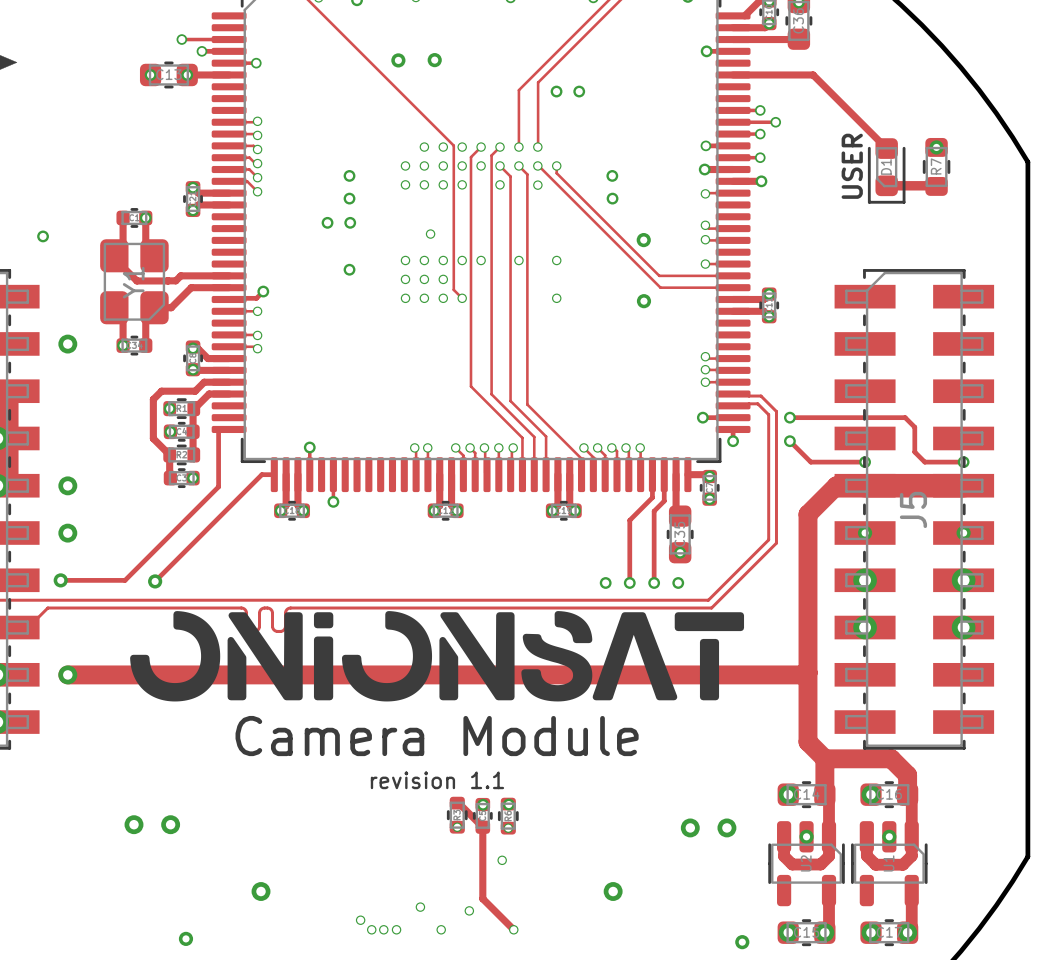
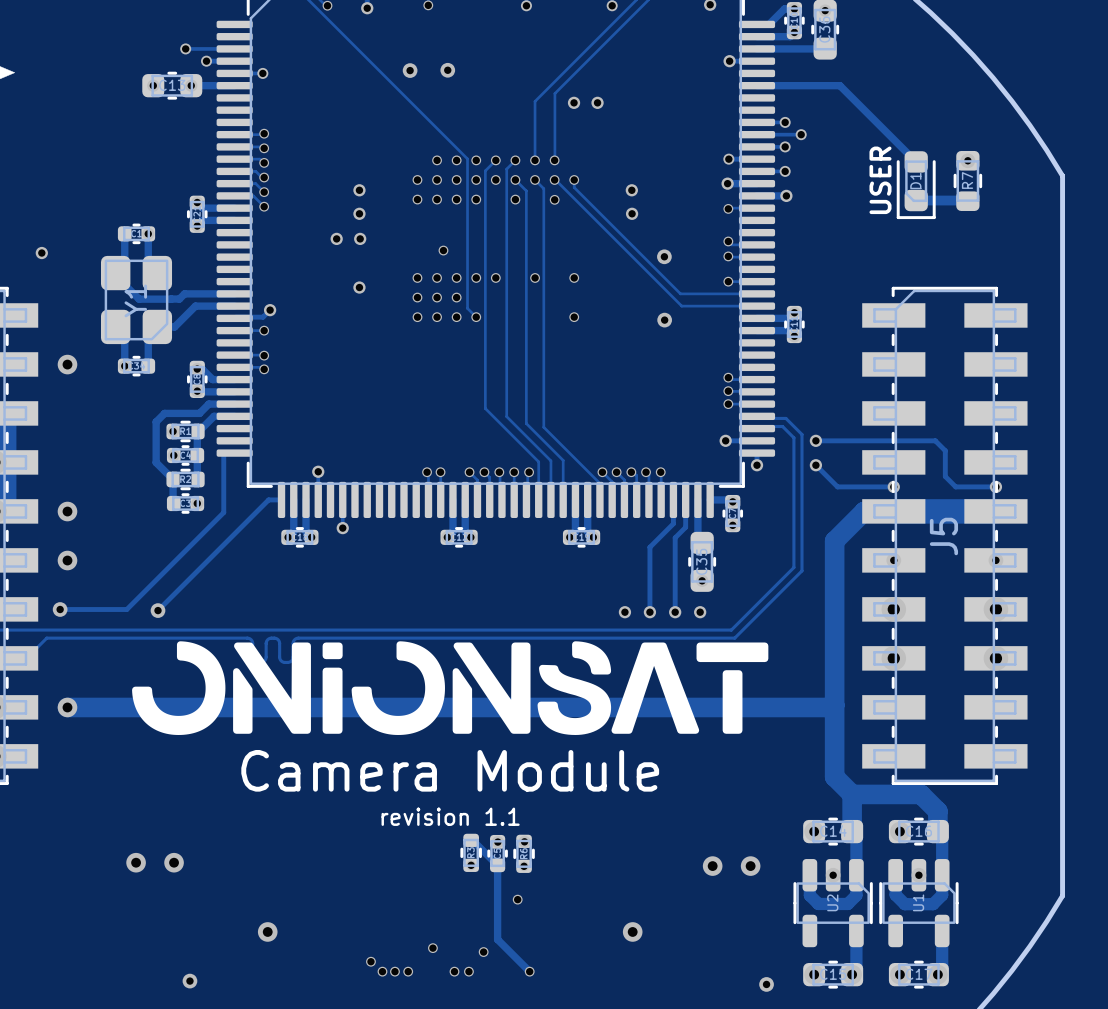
via: none -> (468, 971)

